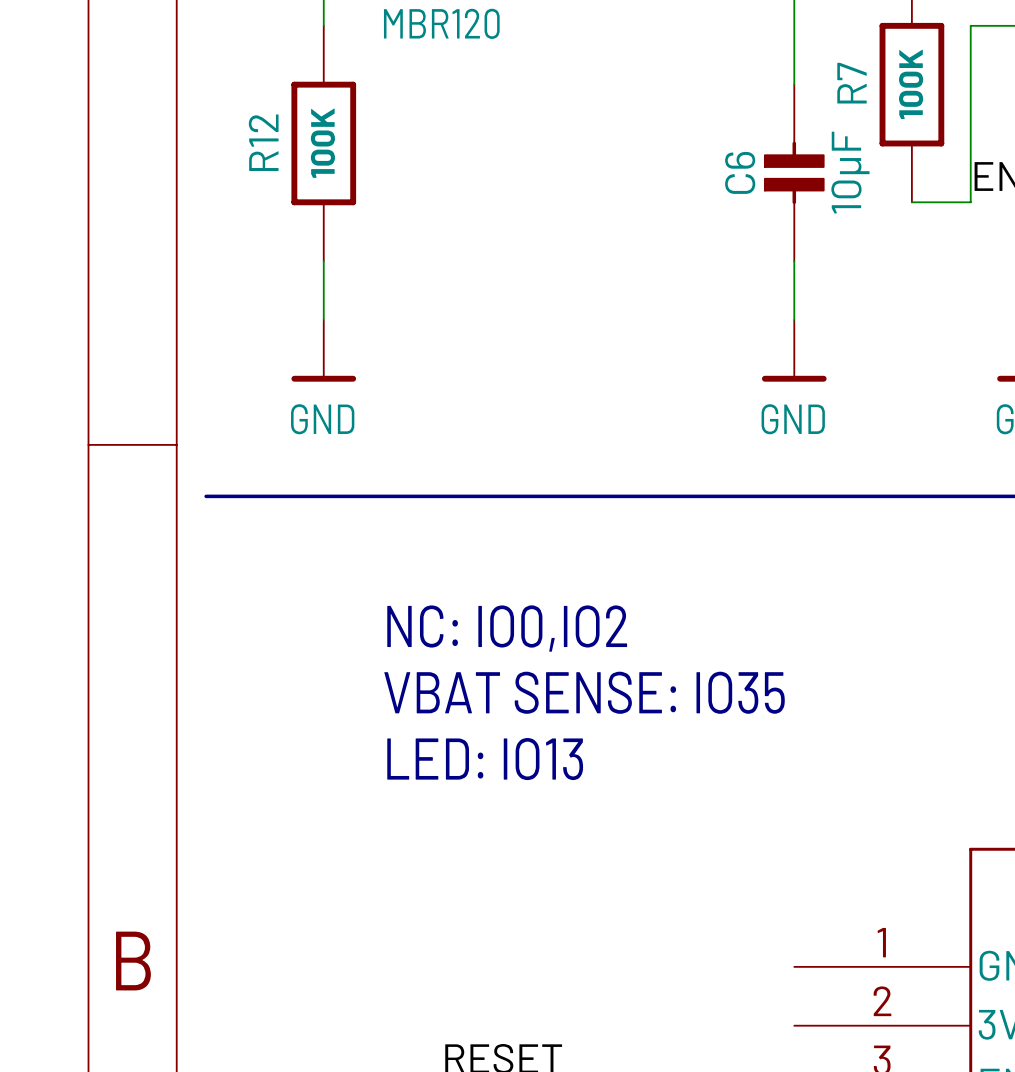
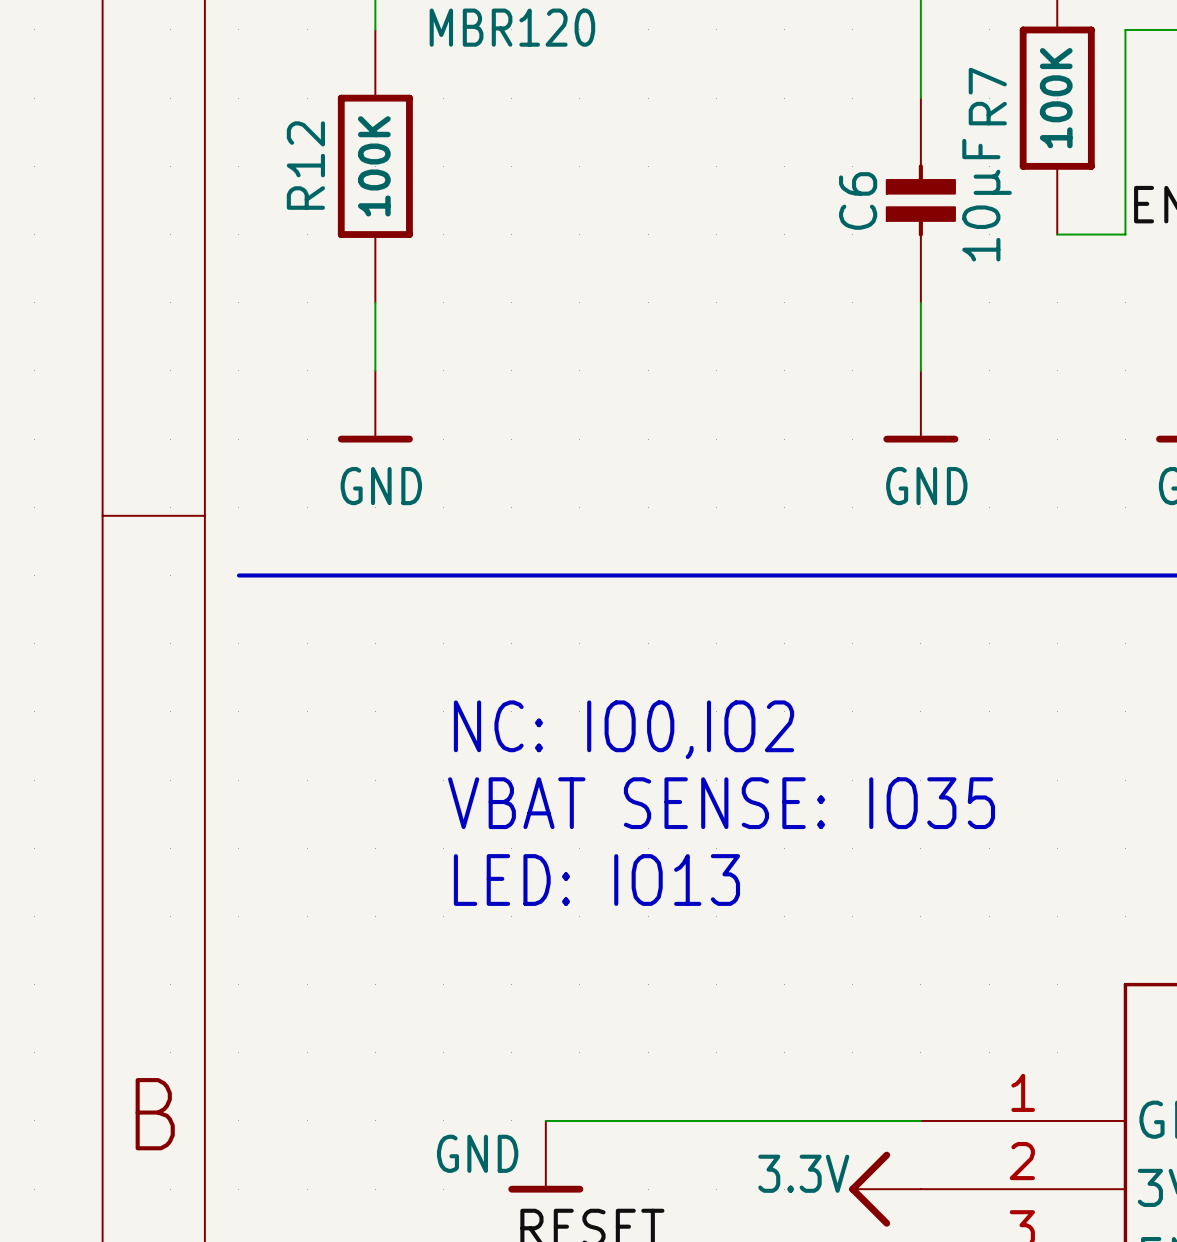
wire: none -> (545, 1120) (920, 1120)
power symbol: none -> GND (545, 1156)
power symbol: none -> 3.3V (885, 1189)

